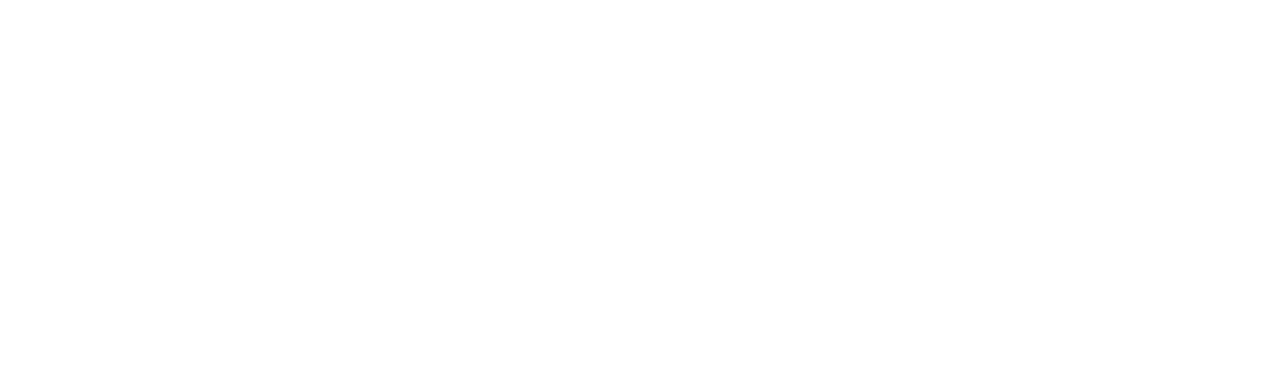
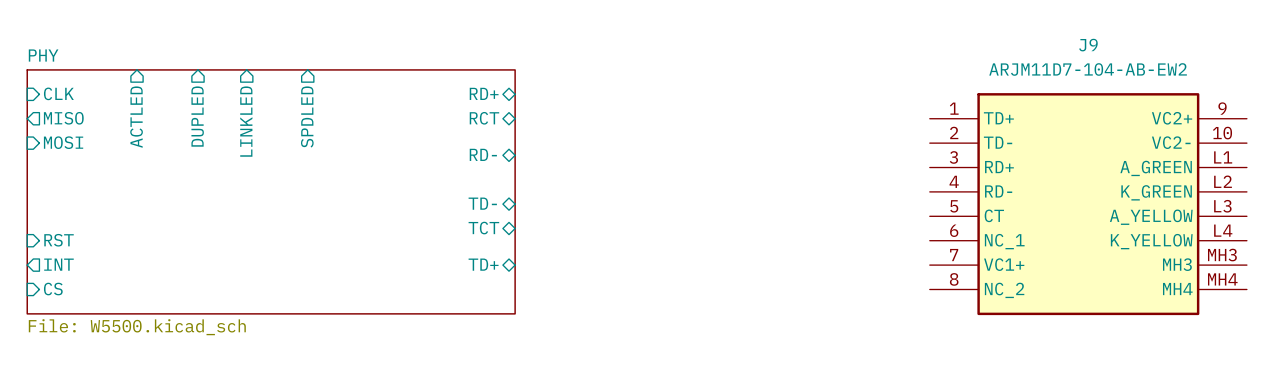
sheet pin: none -> CLK (58, 93)
sheet pin: none -> RD+ (484, 93)
sheet pin: none -> MISO (63, 118)
sheet pin: none -> RCT (484, 118)
sheet pin: none -> ACTLED (136, 117)
sheet pin: none -> SPDLED (307, 116)
sheet pin: none -> DUPLED (197, 116)
sheet pin: none -> LINKLED (246, 121)
sheet pin: none -> MOSI (63, 142)
sheet pin: none -> RD- (483, 154)
sheet PHY: none -> File: W5500.kicad_sch (271, 191)
sheet pin: none -> TD- (482, 203)
J9: none -> ARJM11D7-104-AB-EW2 (1088, 204)
sheet pin: none -> TCT (483, 228)
sheet pin: none -> RST (59, 240)
sheet pin: none -> INT (58, 264)
sheet pin: none -> TD+ (483, 264)
sheet pin: none -> CS (53, 289)

